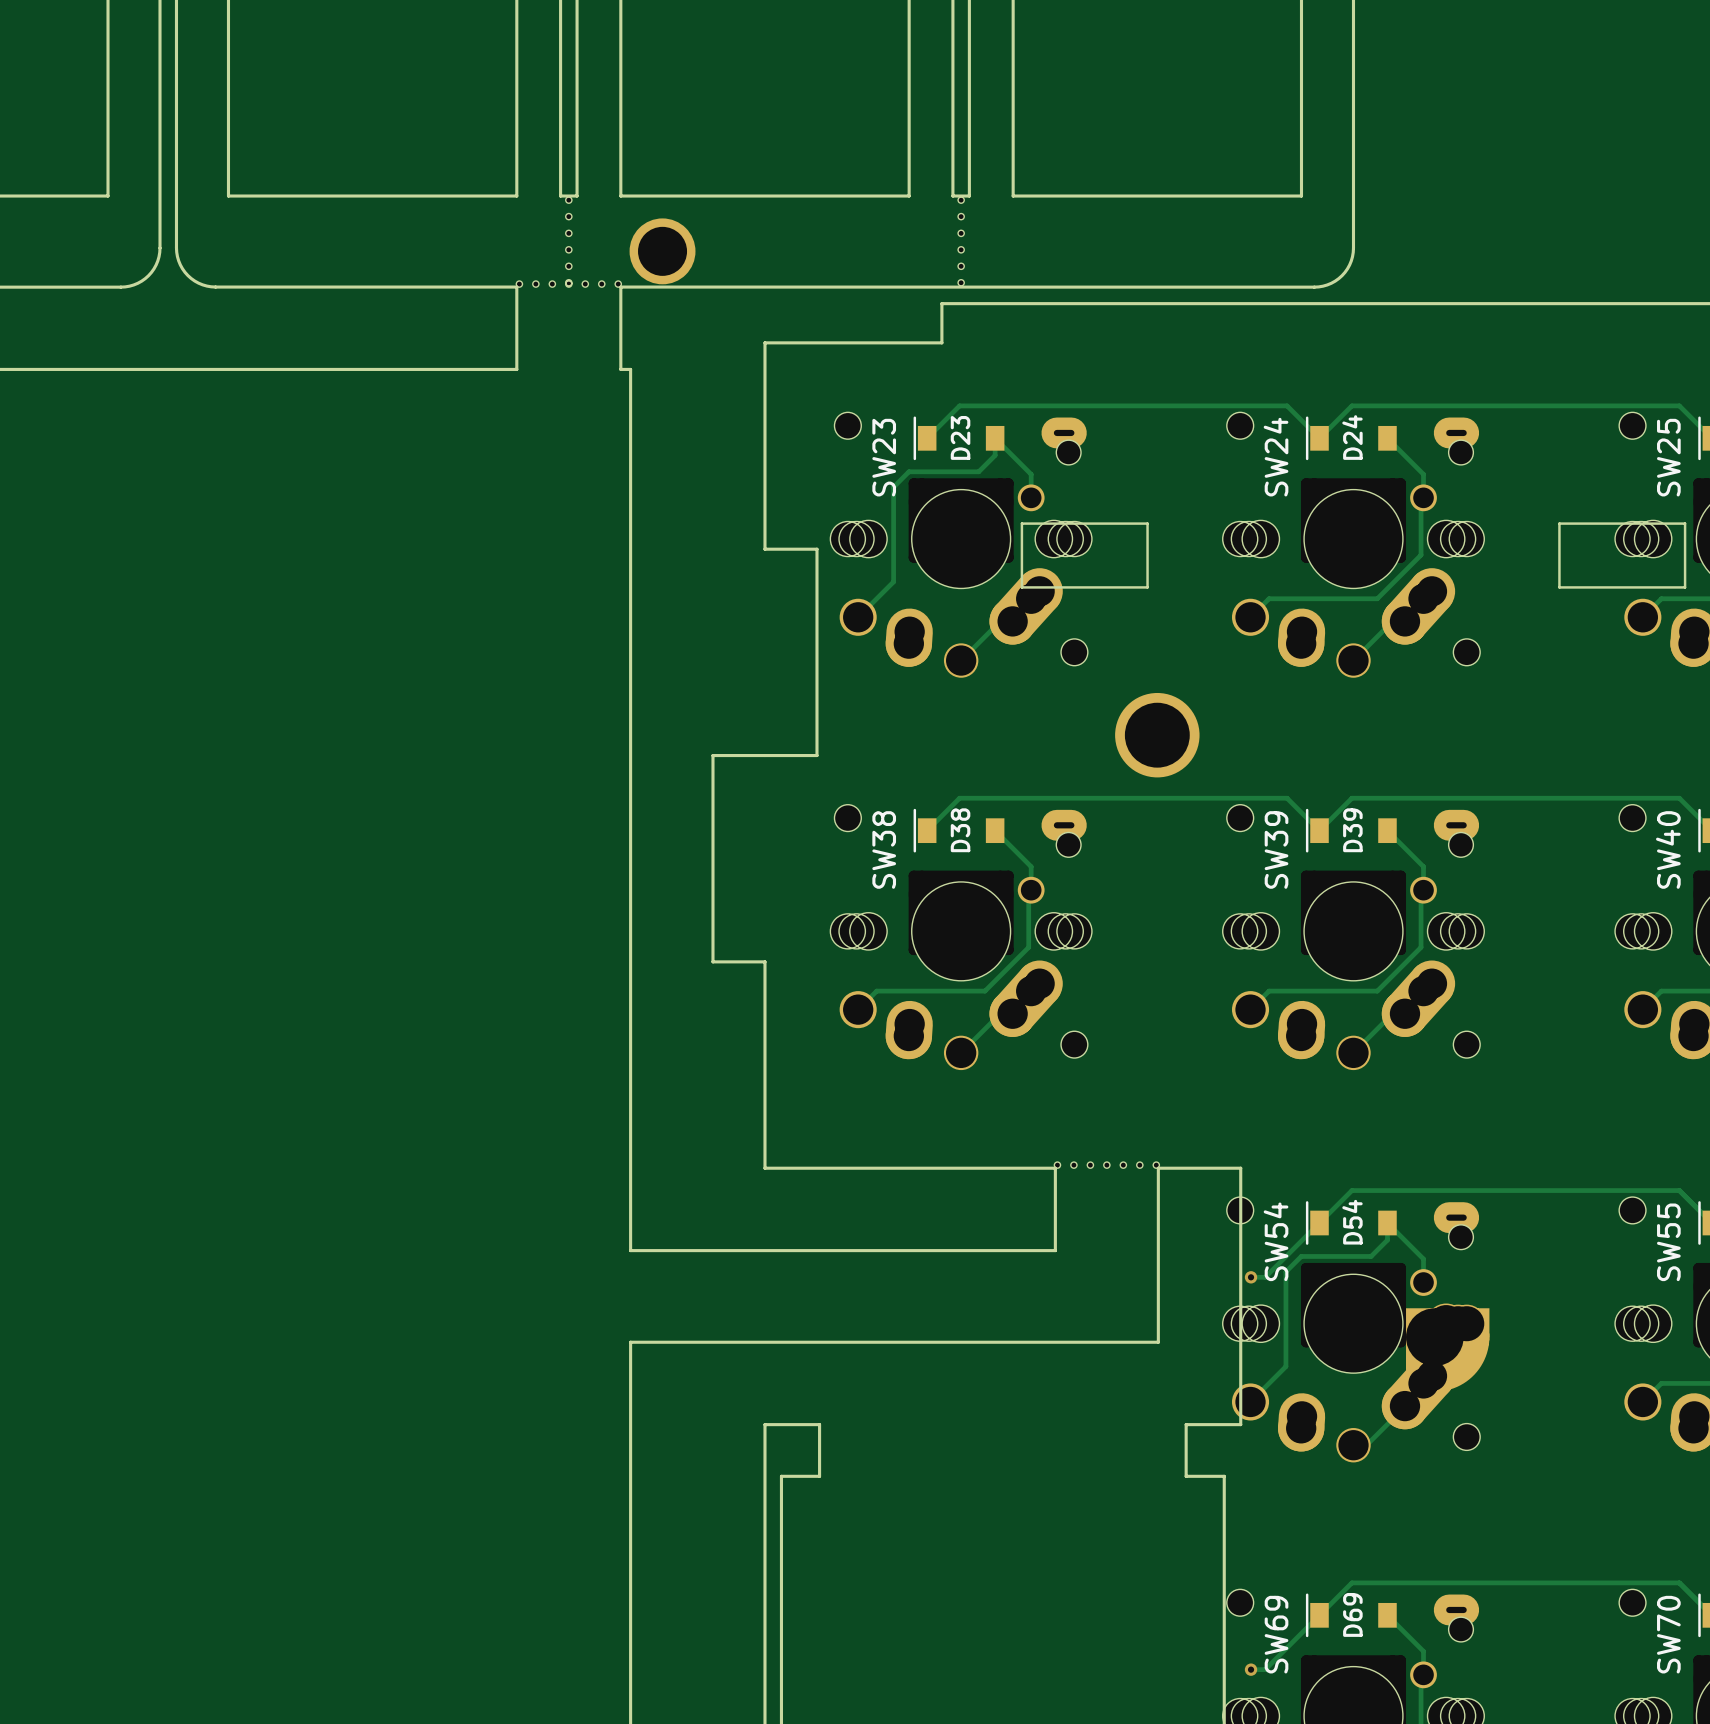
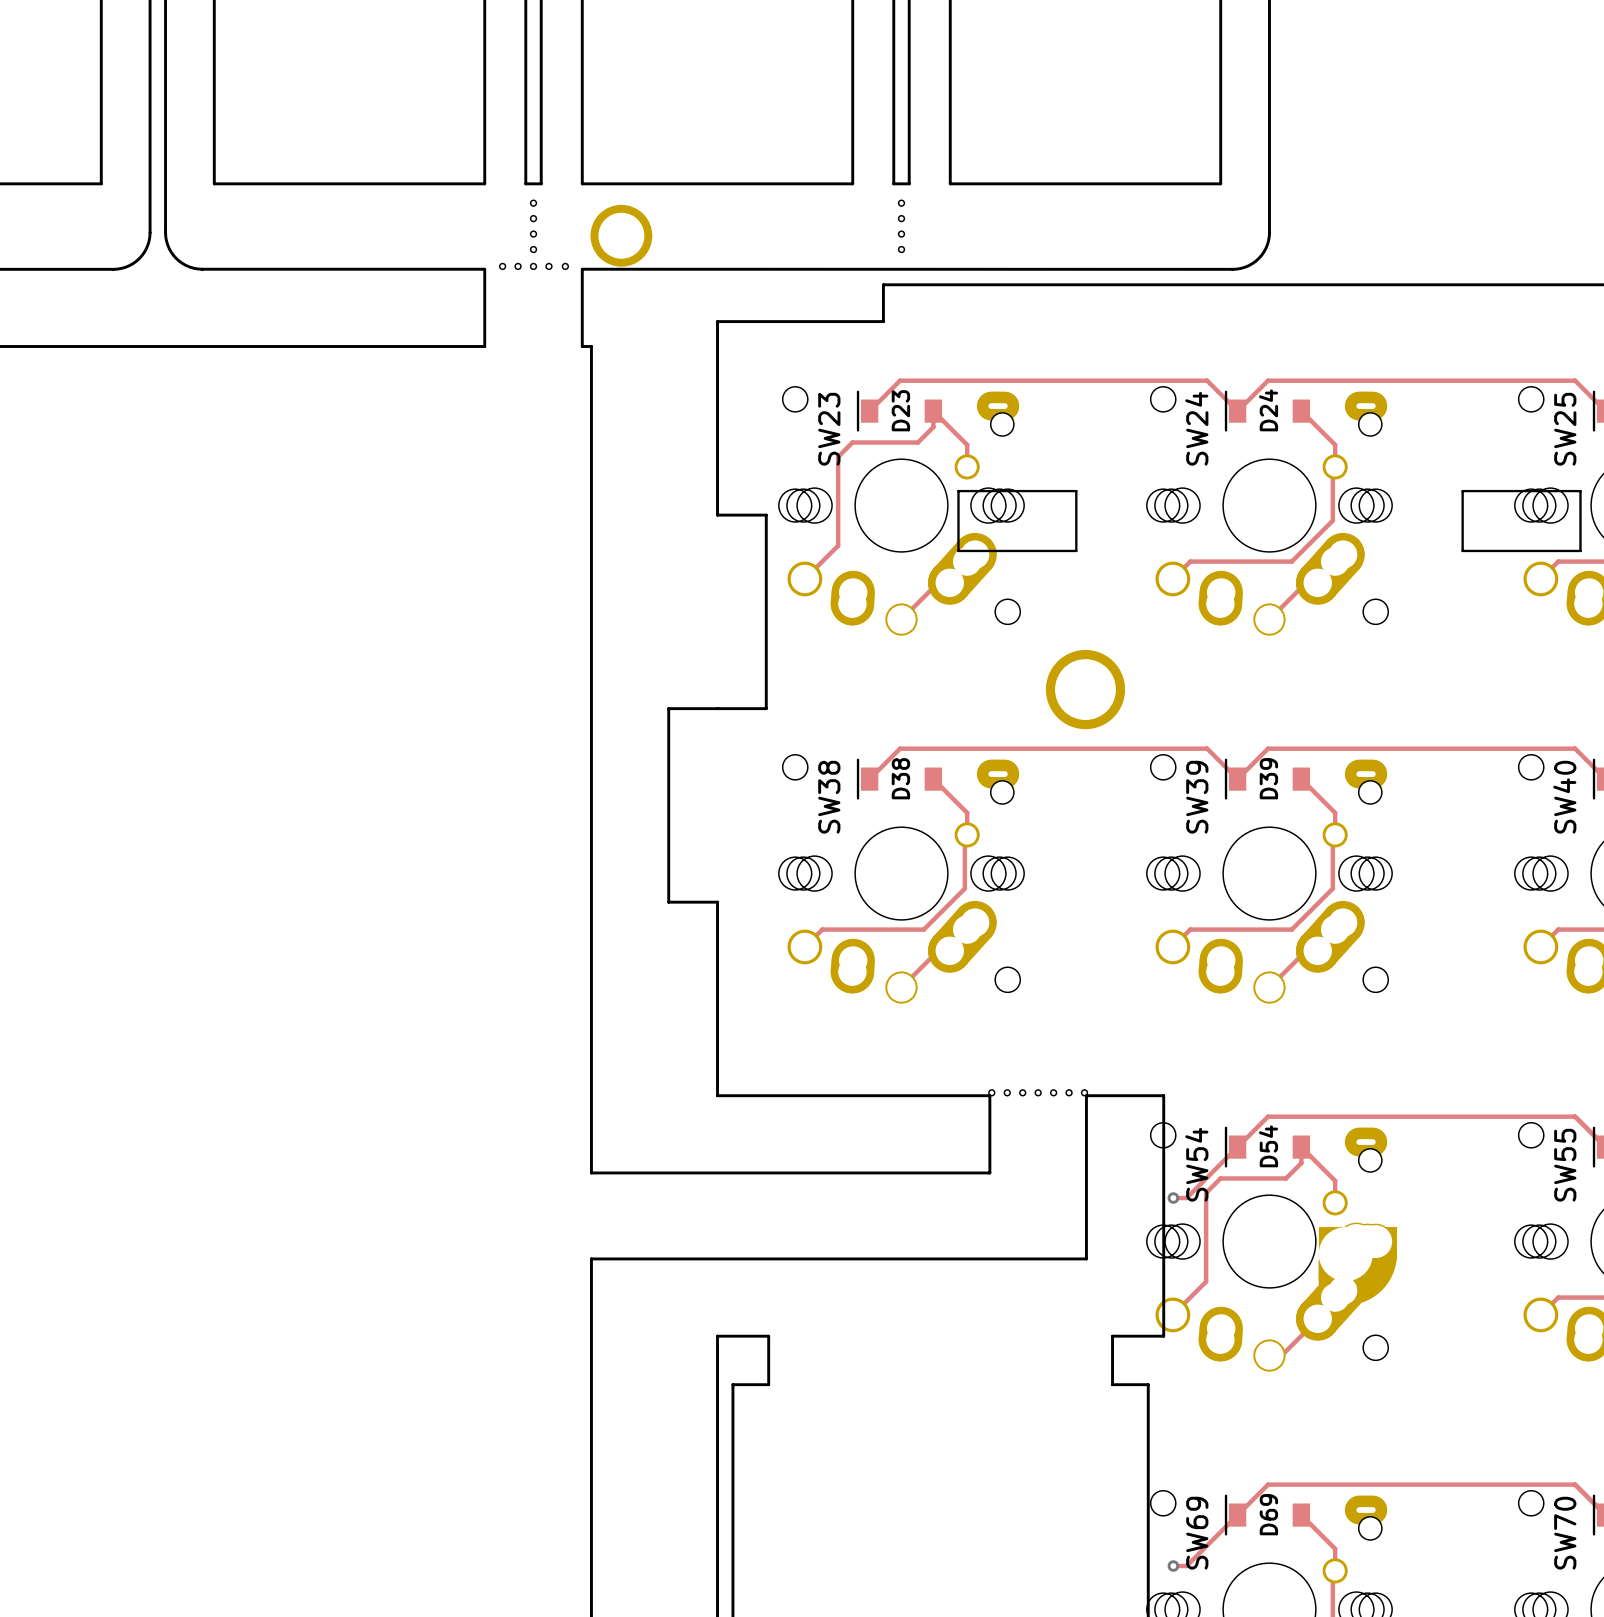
part footprint: [565, 197, 572, 286] -> [530, 200, 537, 253]
part footprint: [958, 197, 965, 286] -> [898, 200, 905, 253]
part footprint: [516, 280, 622, 288] -> [499, 263, 569, 270]

